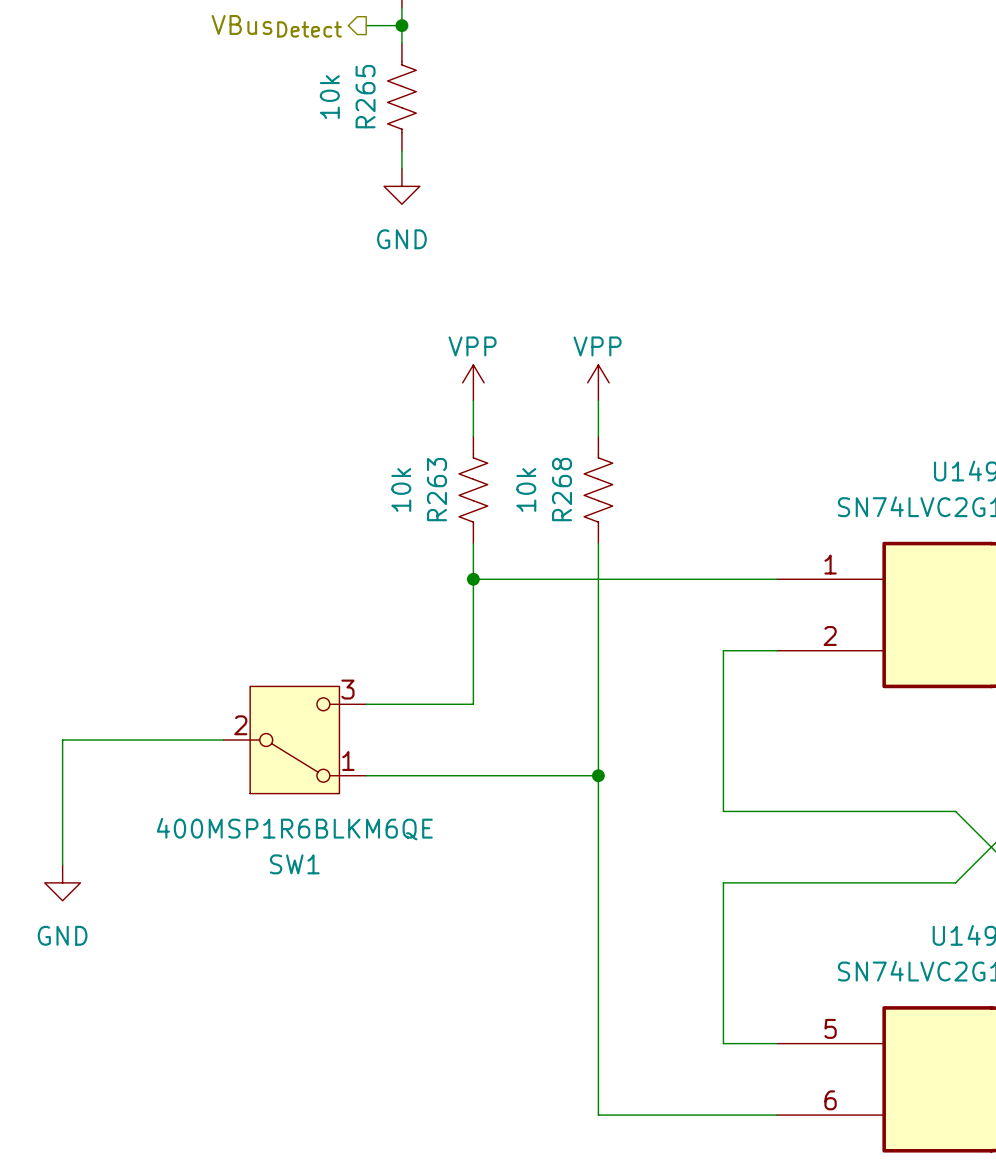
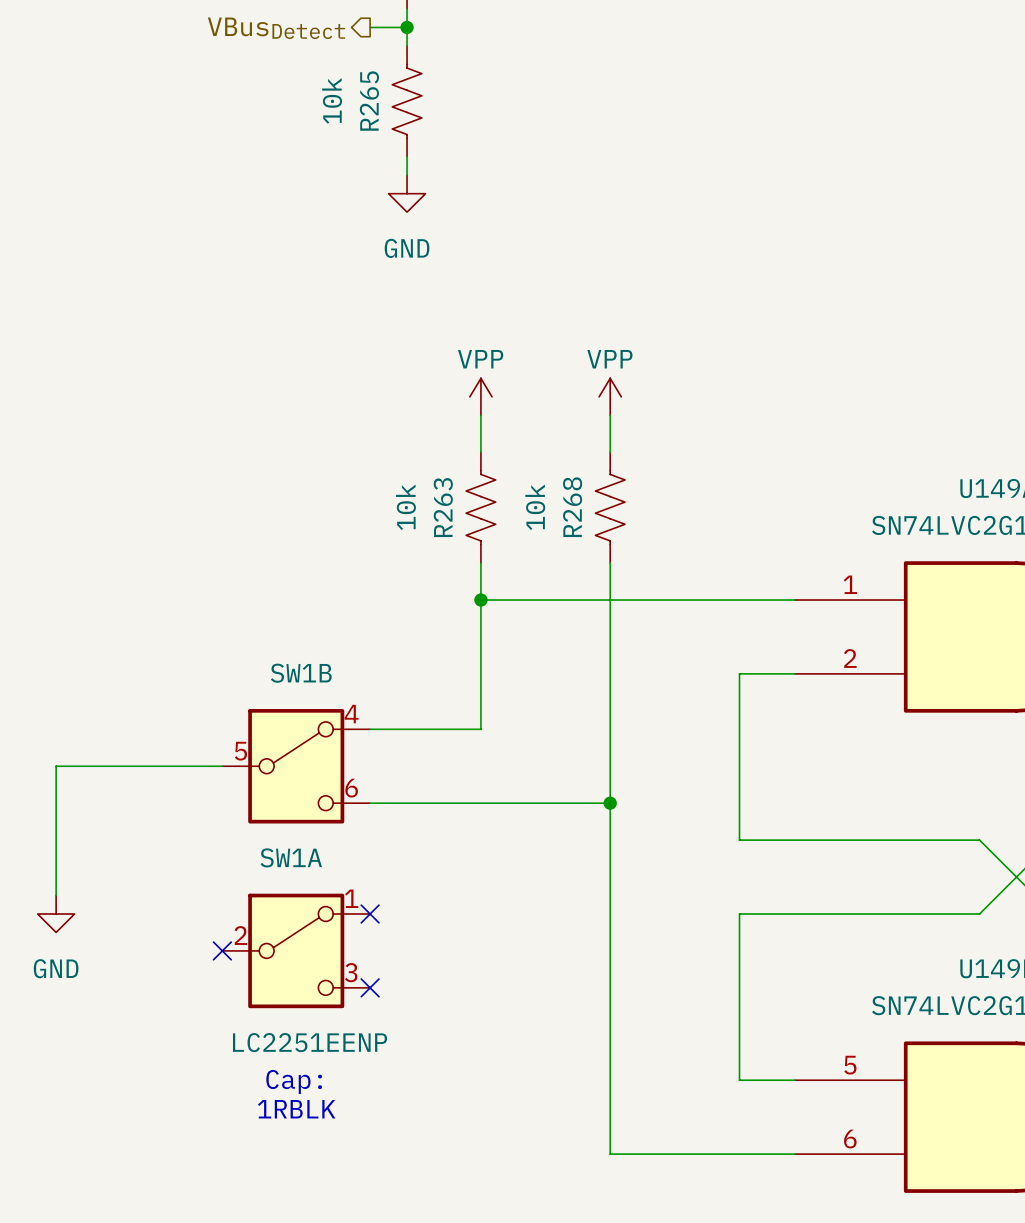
SW1: 400MSP1R6BLKM6QE (294, 740) -> none
SW1B: none -> LC2251EENP (296, 766)
no-connect mark: none -> (370, 913)
no-connect mark: none -> (222, 950)
SW1A: none -> (296, 950)
no-connect mark: none -> (370, 987)
text: none -> Cap: (294, 1081)
text: none -> 1RBLK (296, 1109)

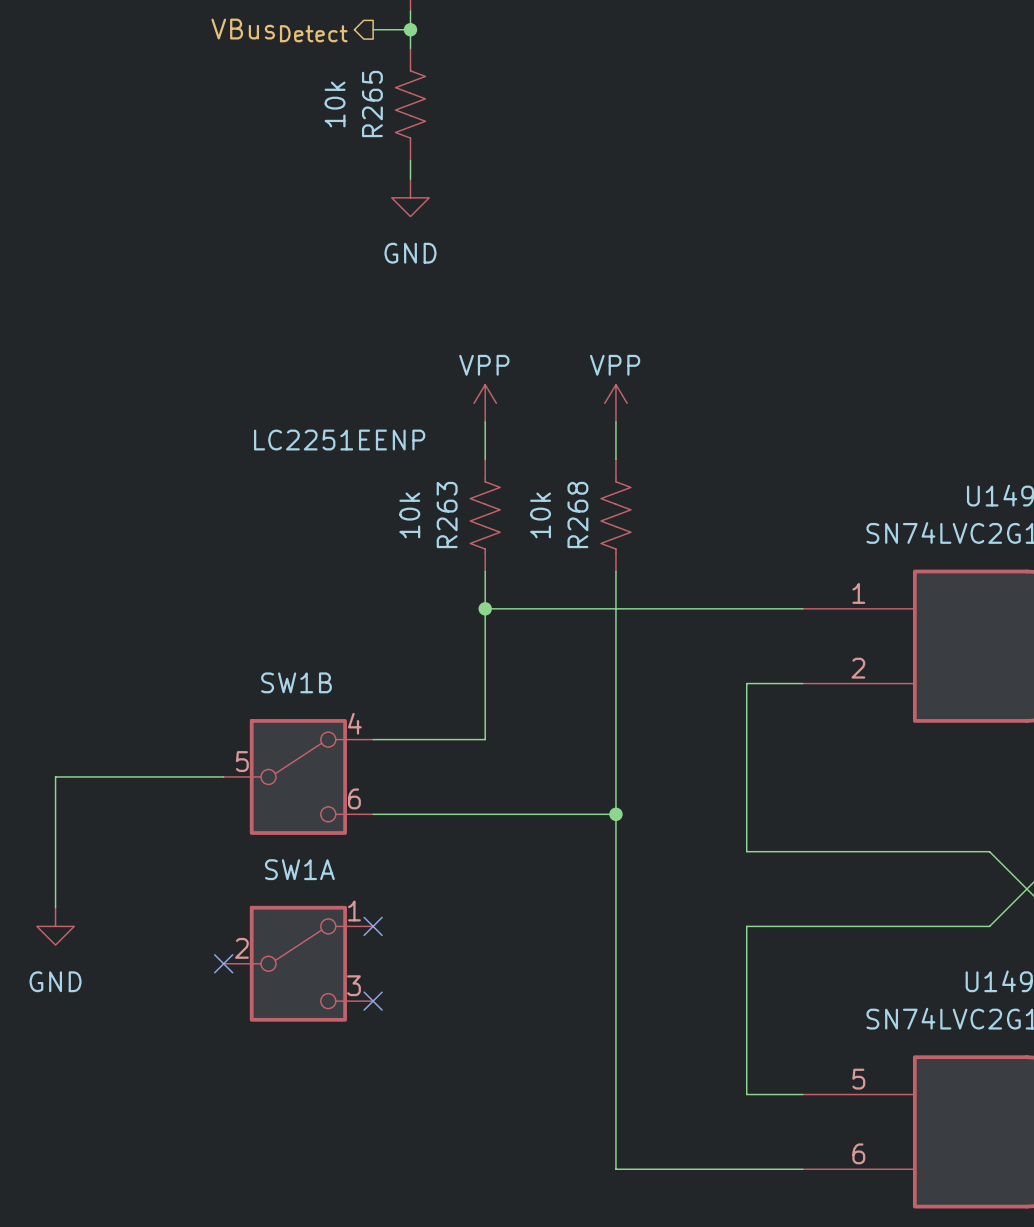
SW1B value position: LC2251EENP (310, 1042) -> LC2251EENP (339, 440)
text: Cap: (294, 1081) -> none
text: 1RBLK (296, 1109) -> none

